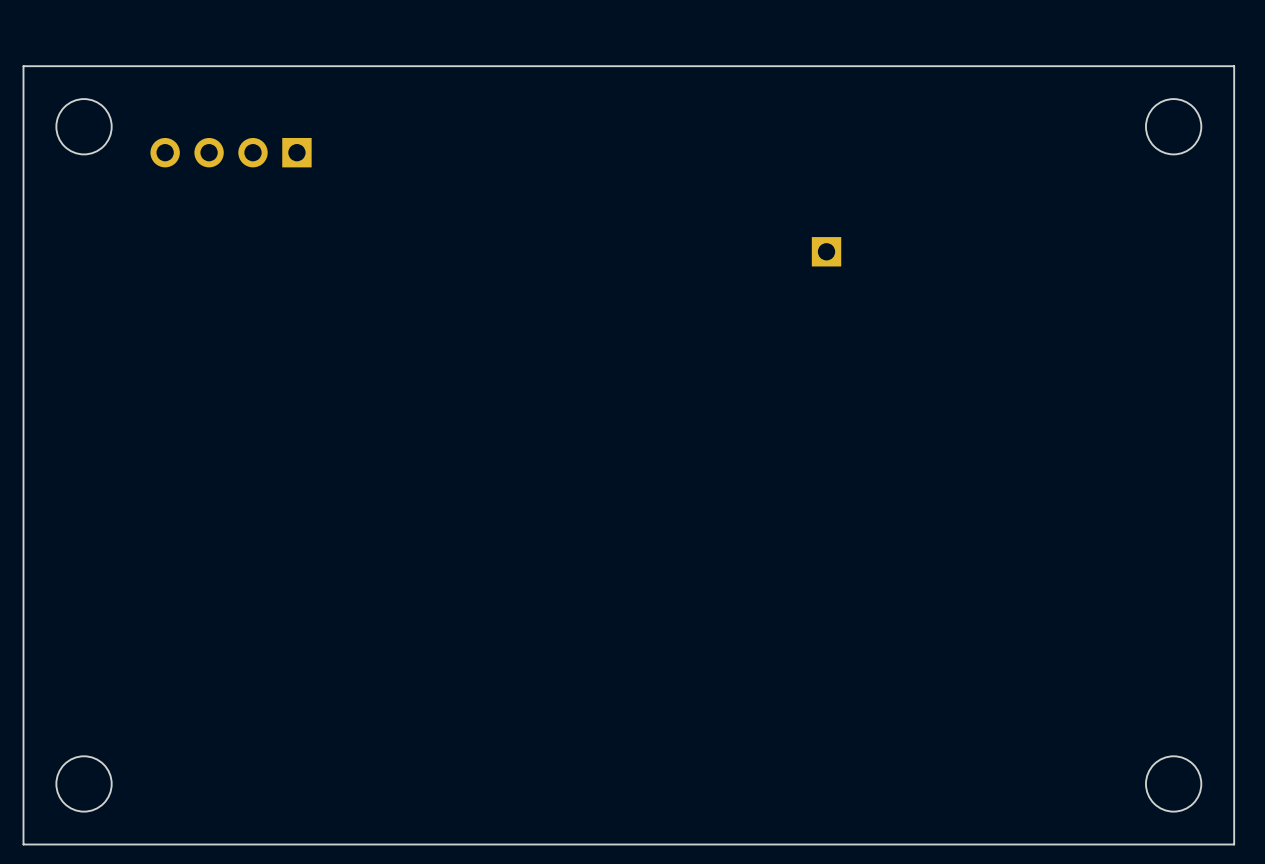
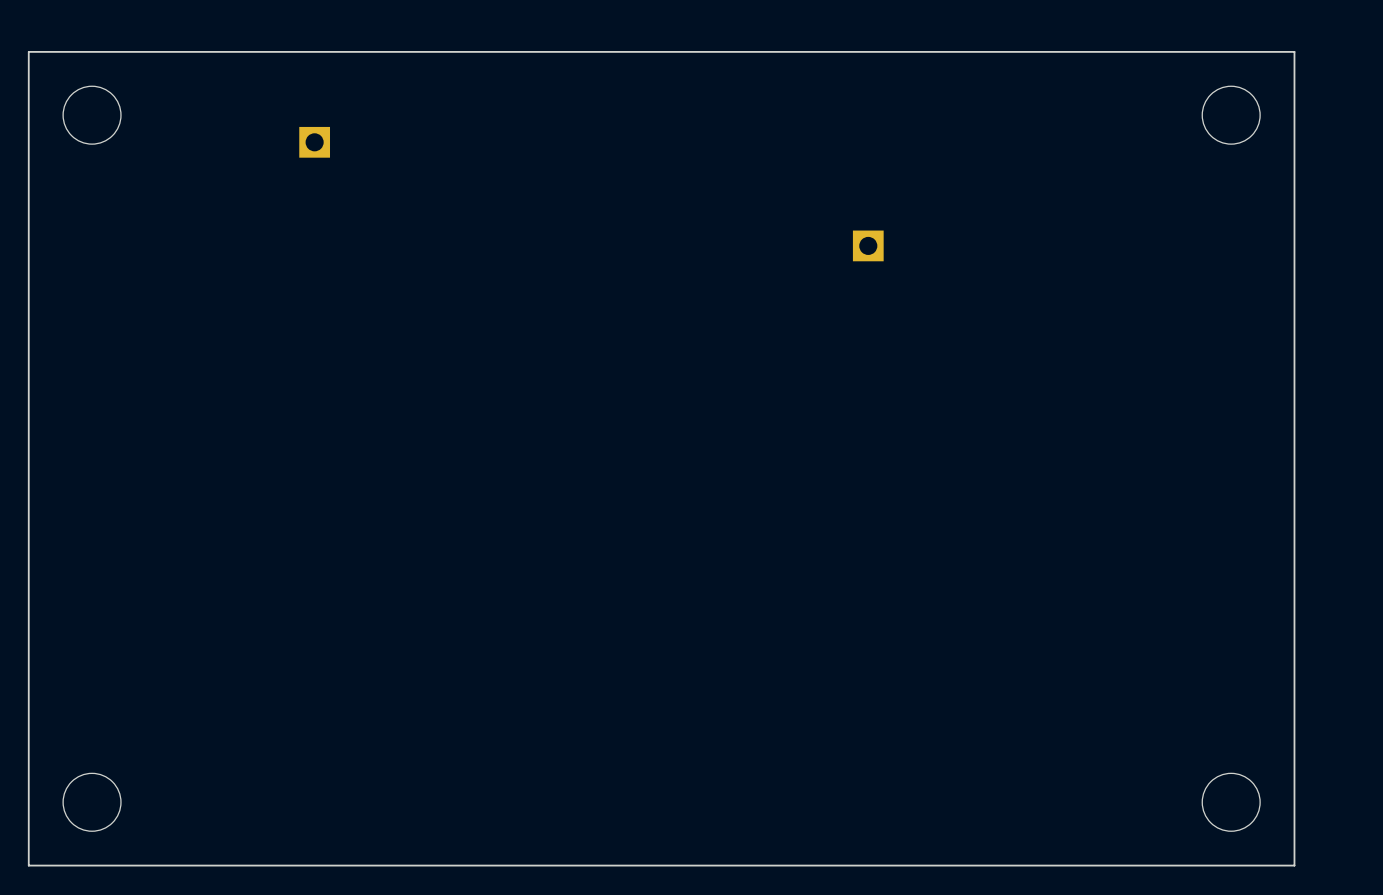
part: (231, 152) -> none

